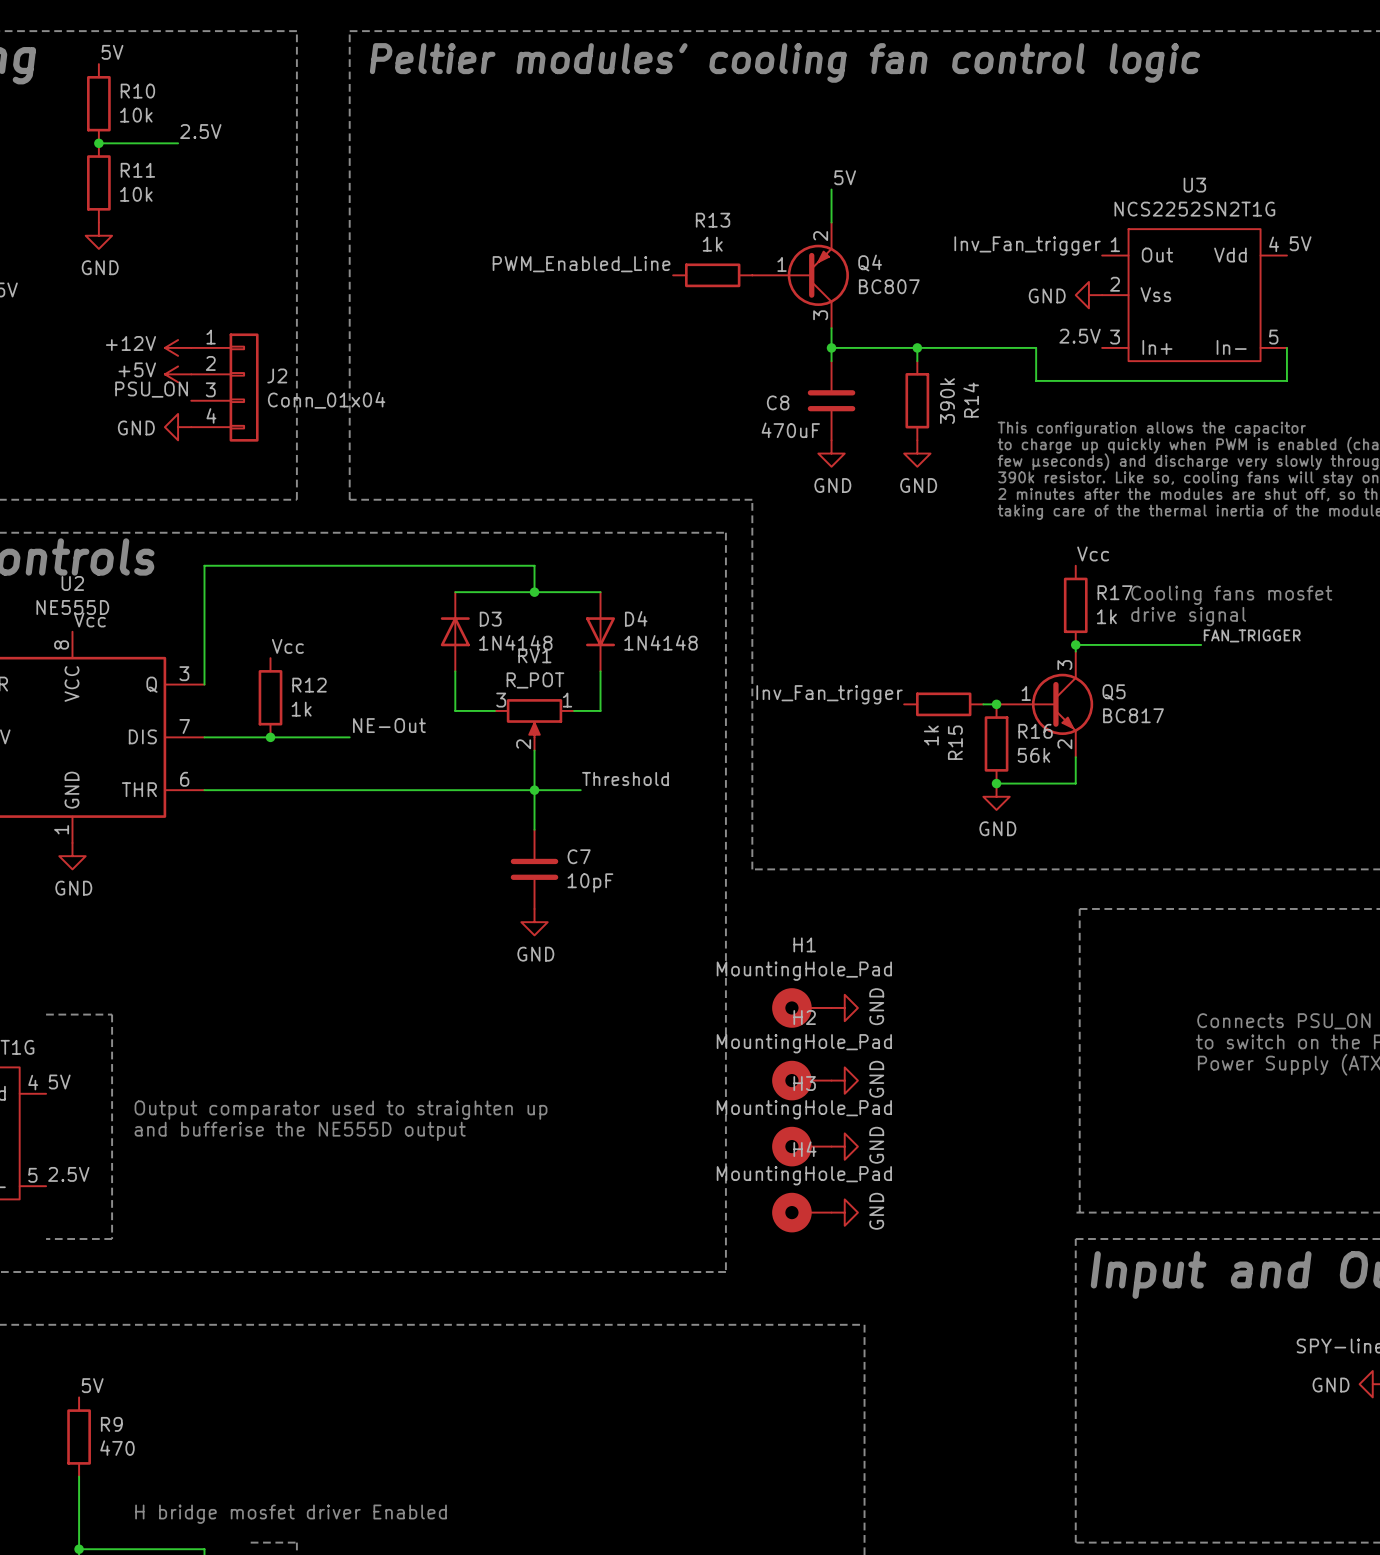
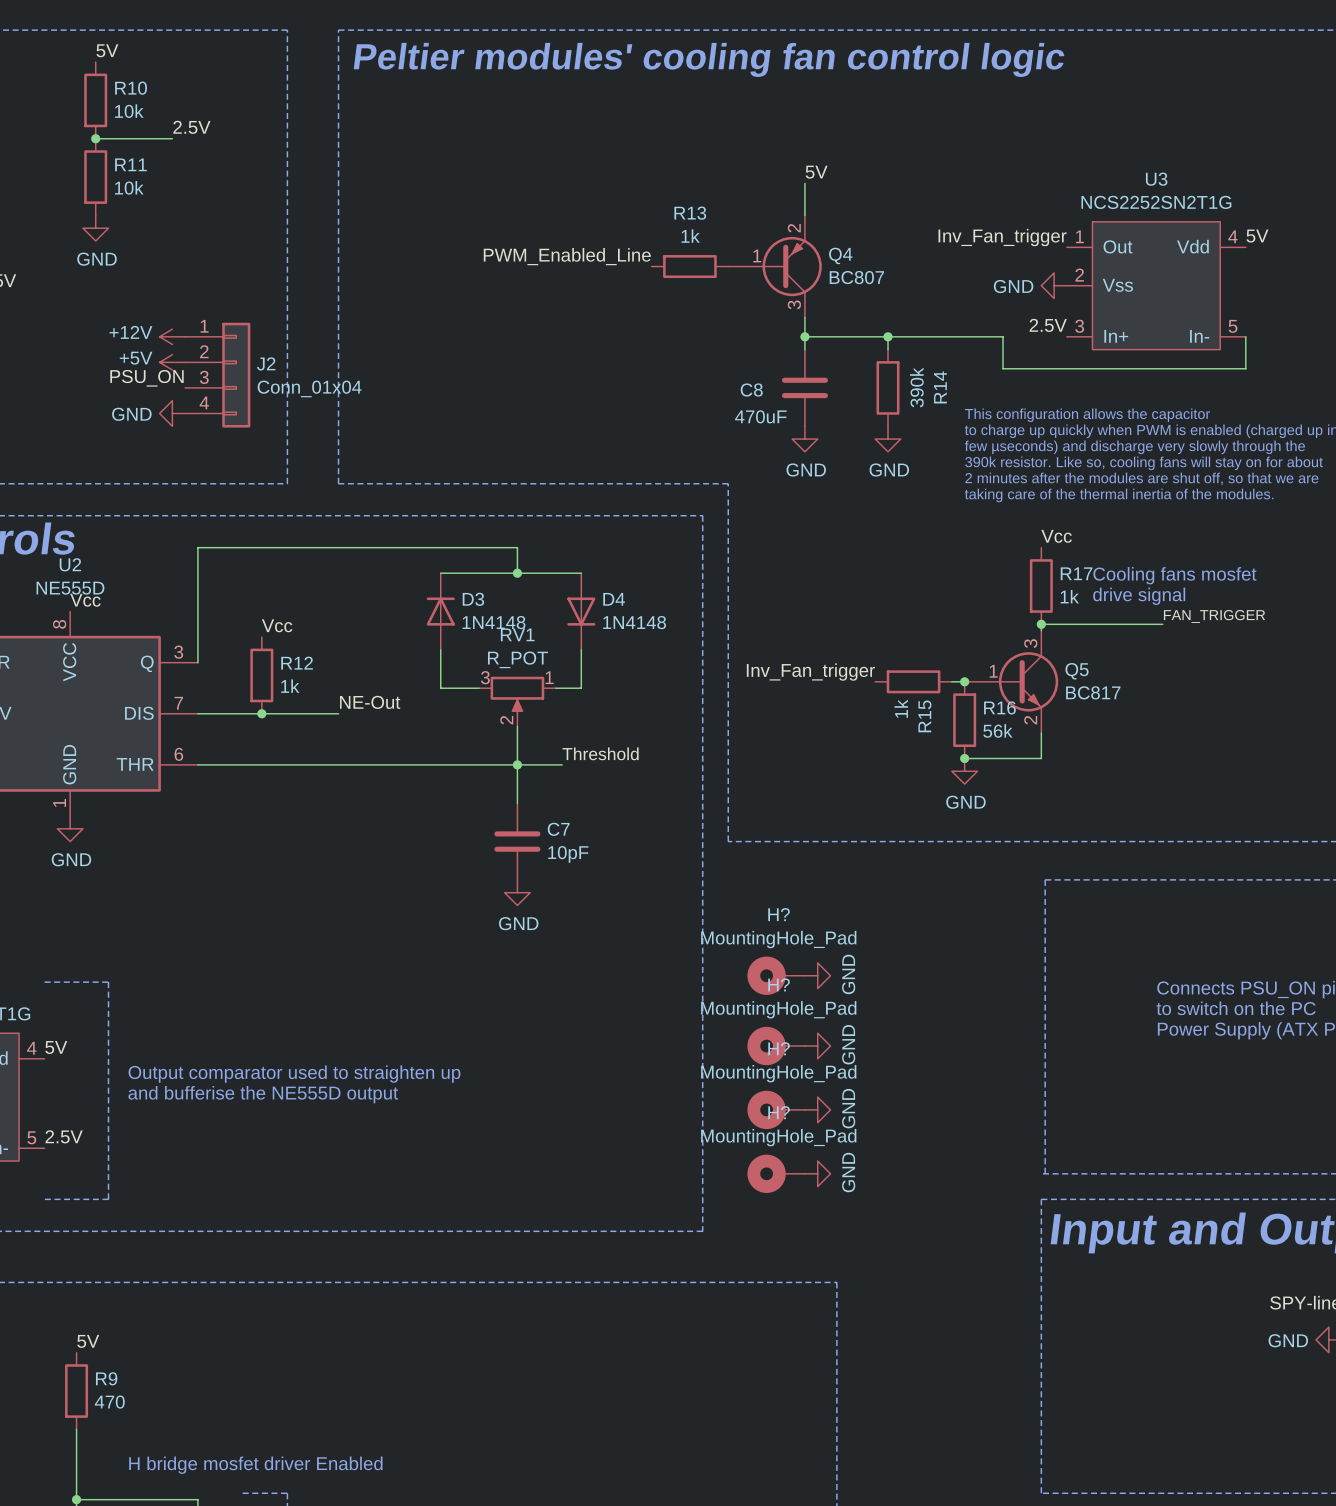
H1 name: H1 (804, 944) -> H? (779, 914)
H2 name: H2 (804, 1017) -> H? (779, 984)
H3 name: H3 (804, 1083) -> H? (779, 1048)
H4 name: H4 (804, 1149) -> H? (779, 1112)

